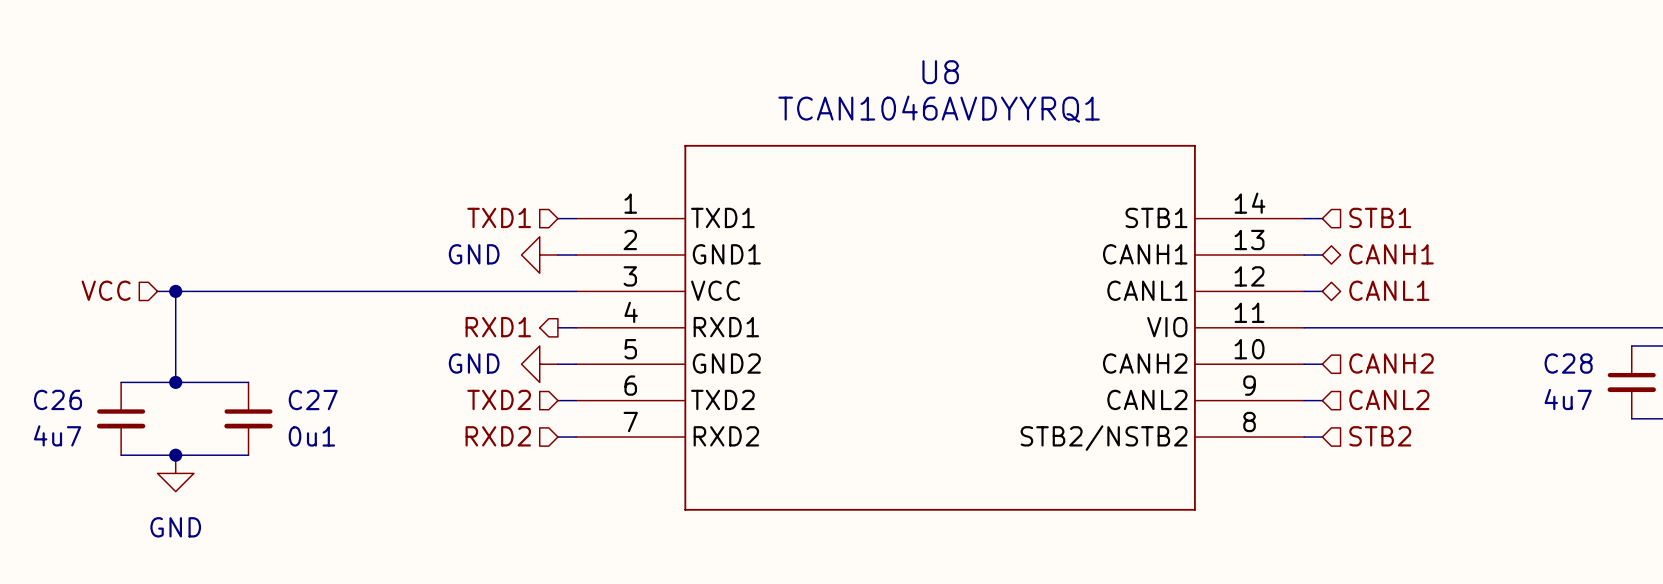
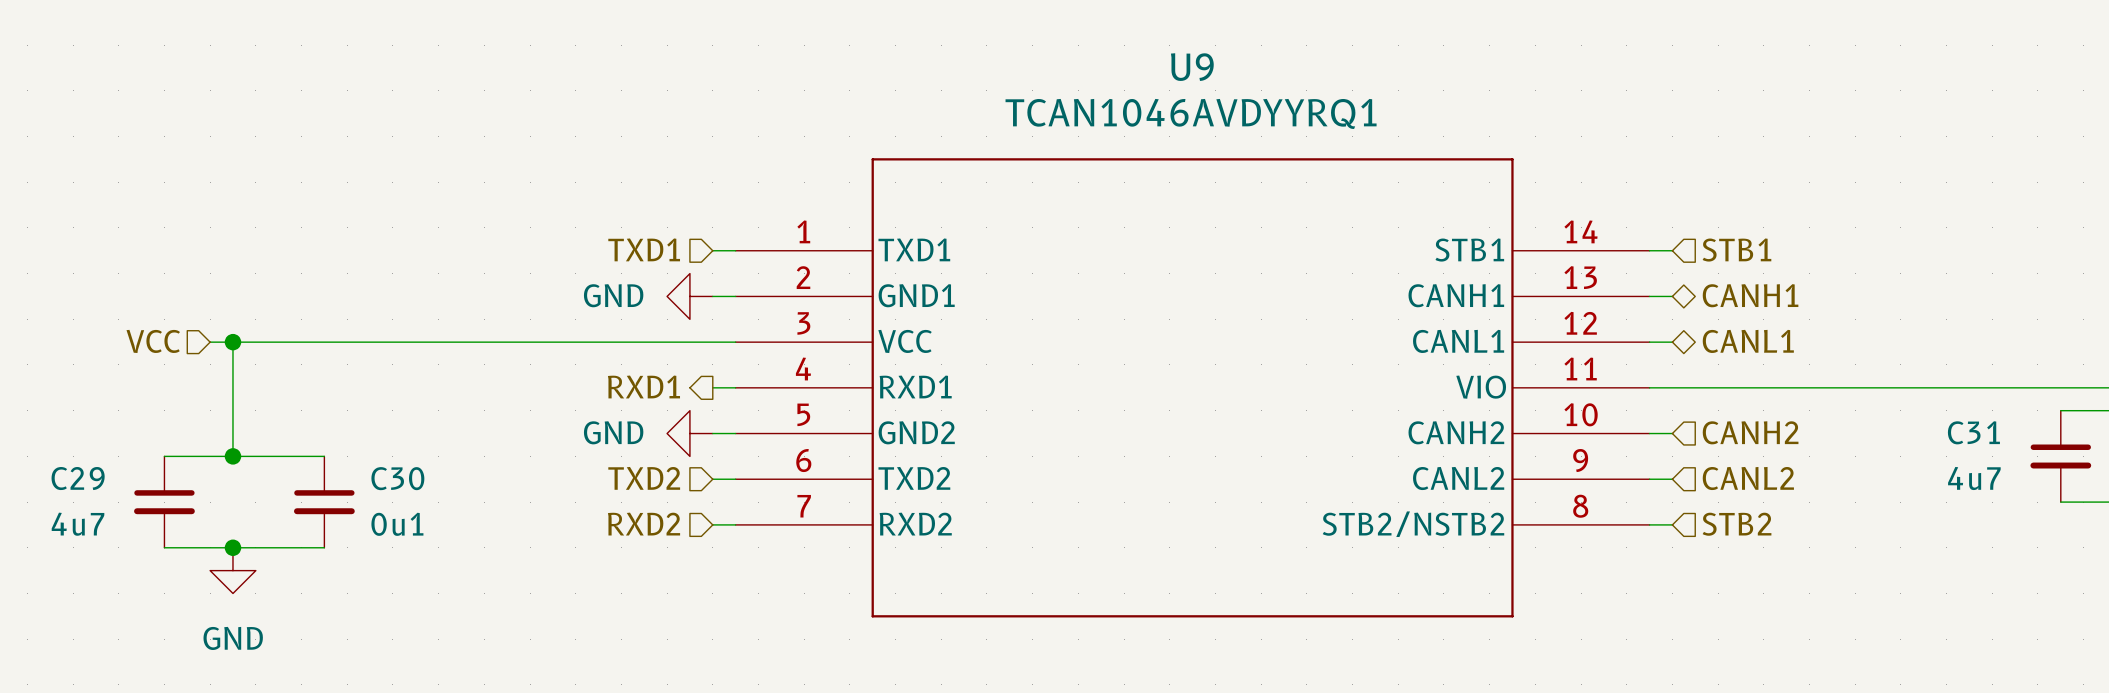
U8 name: U8 (940, 72) -> U9 (1192, 67)
C28 name: C28 (1568, 363) -> C31 (1973, 432)
C26 name: C26 (57, 399) -> C29 (78, 478)
C27 name: C27 (313, 400) -> C30 (397, 478)

